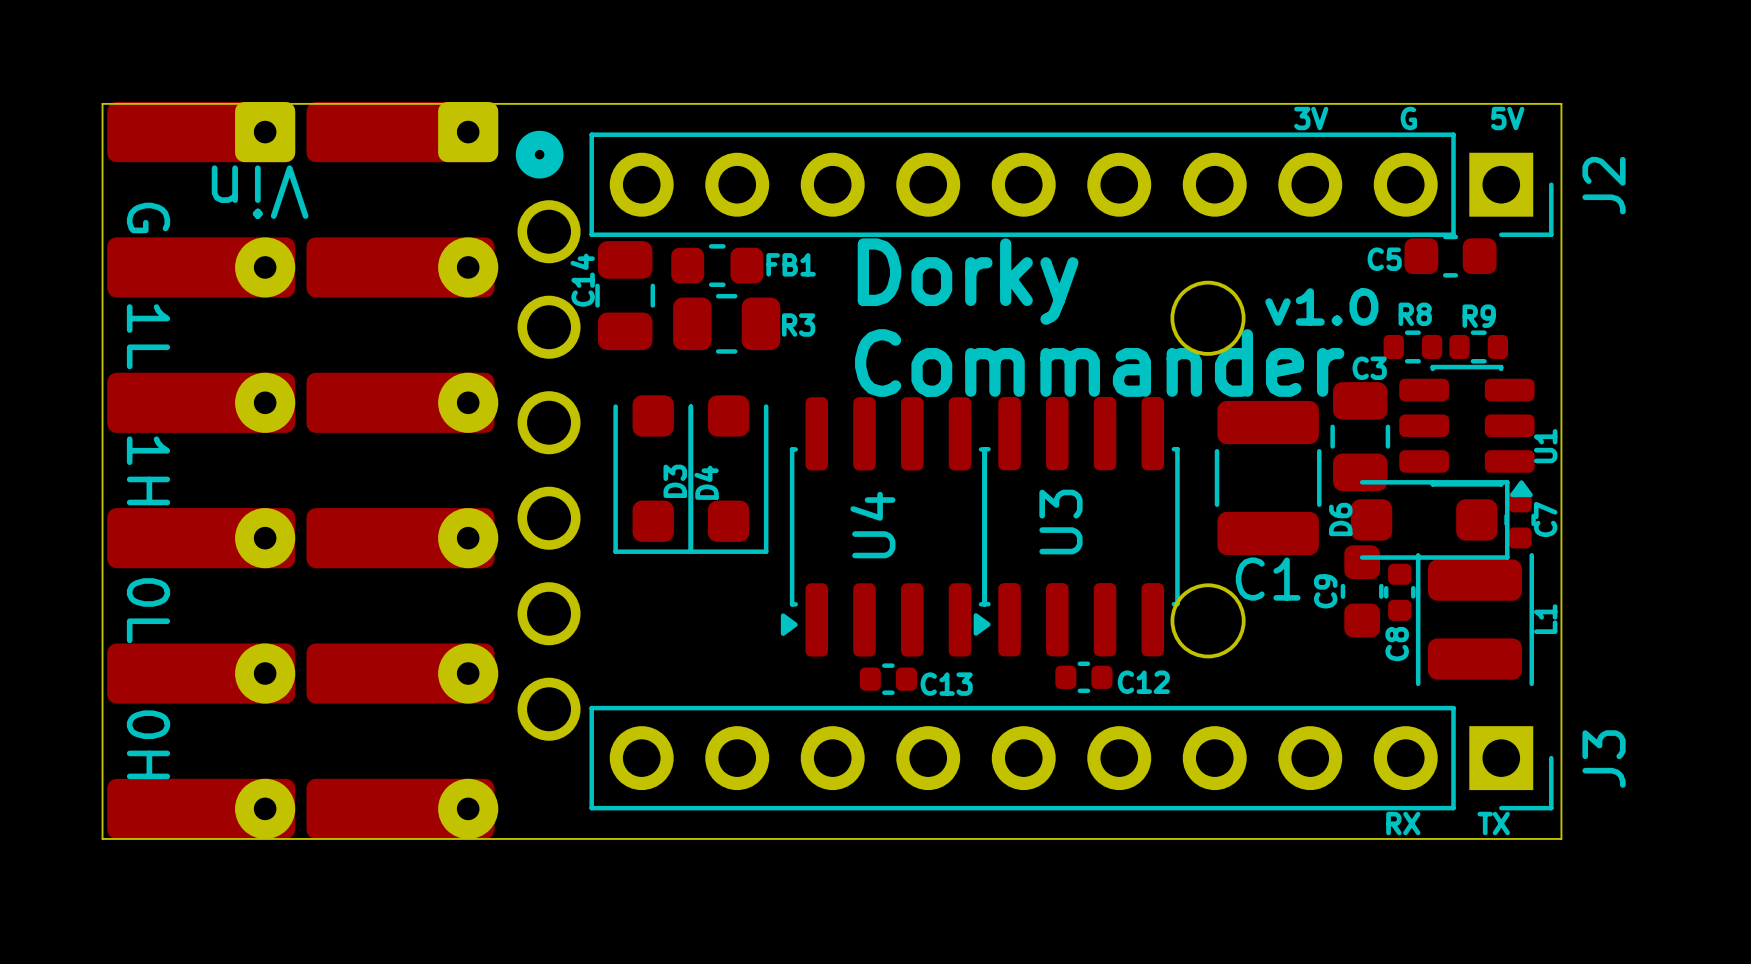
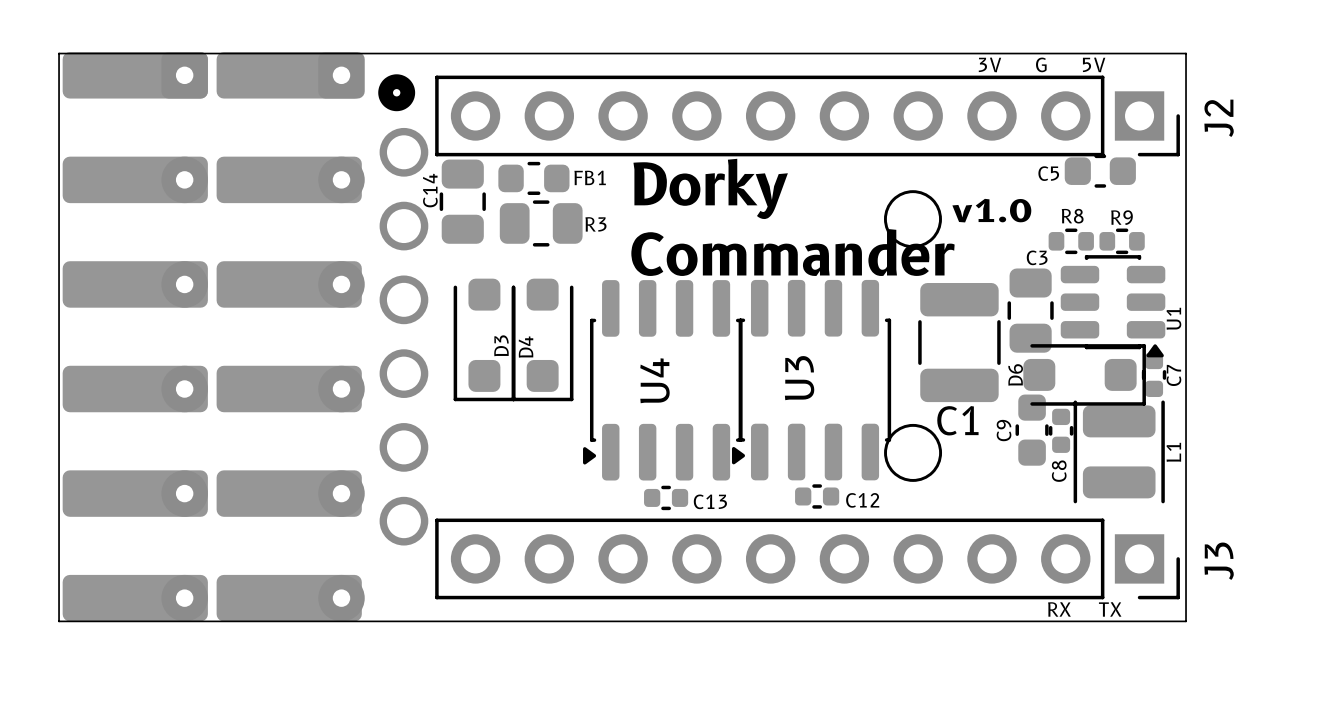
text: Vin (260, 192) -> none
text: G 1L 1H 0L 0H (148, 490) -> none

